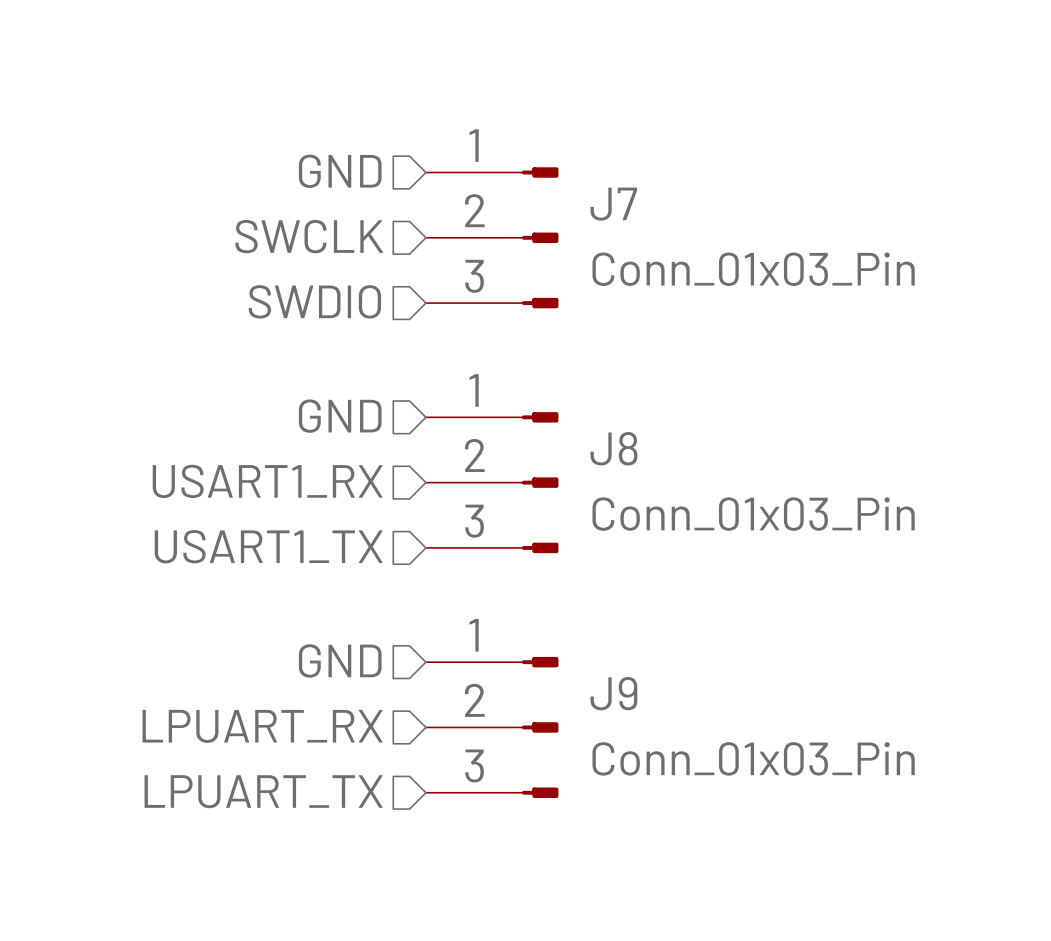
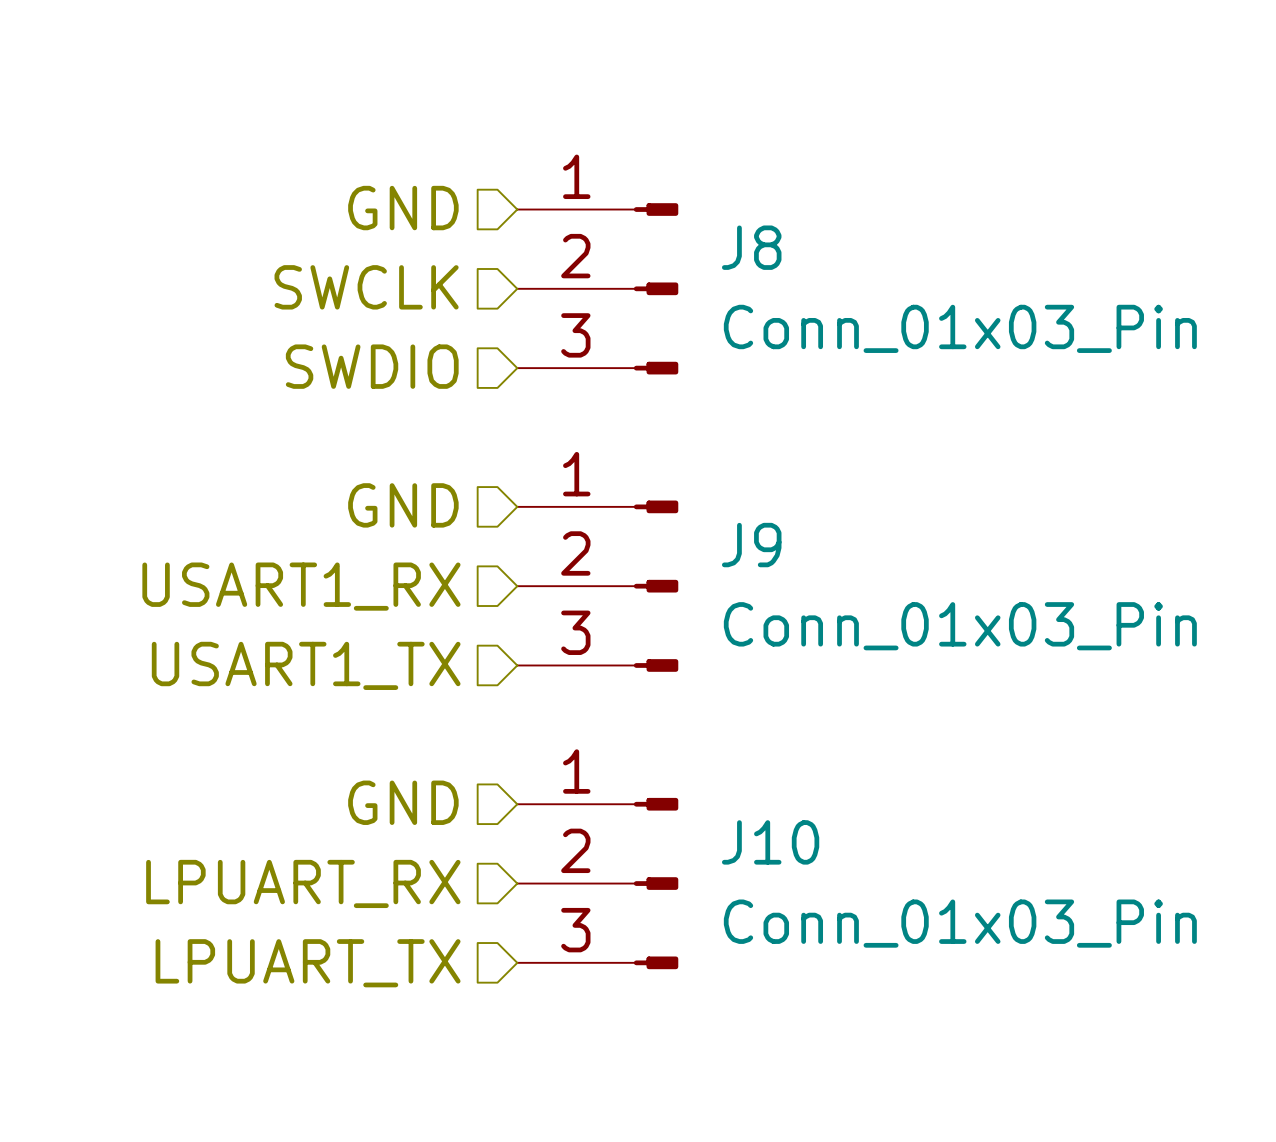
J7 name: J7 (613, 204) -> J8 (751, 247)
J8 name: J8 (613, 448) -> J9 (751, 545)
J9 name: J9 (613, 693) -> J10 (770, 842)

